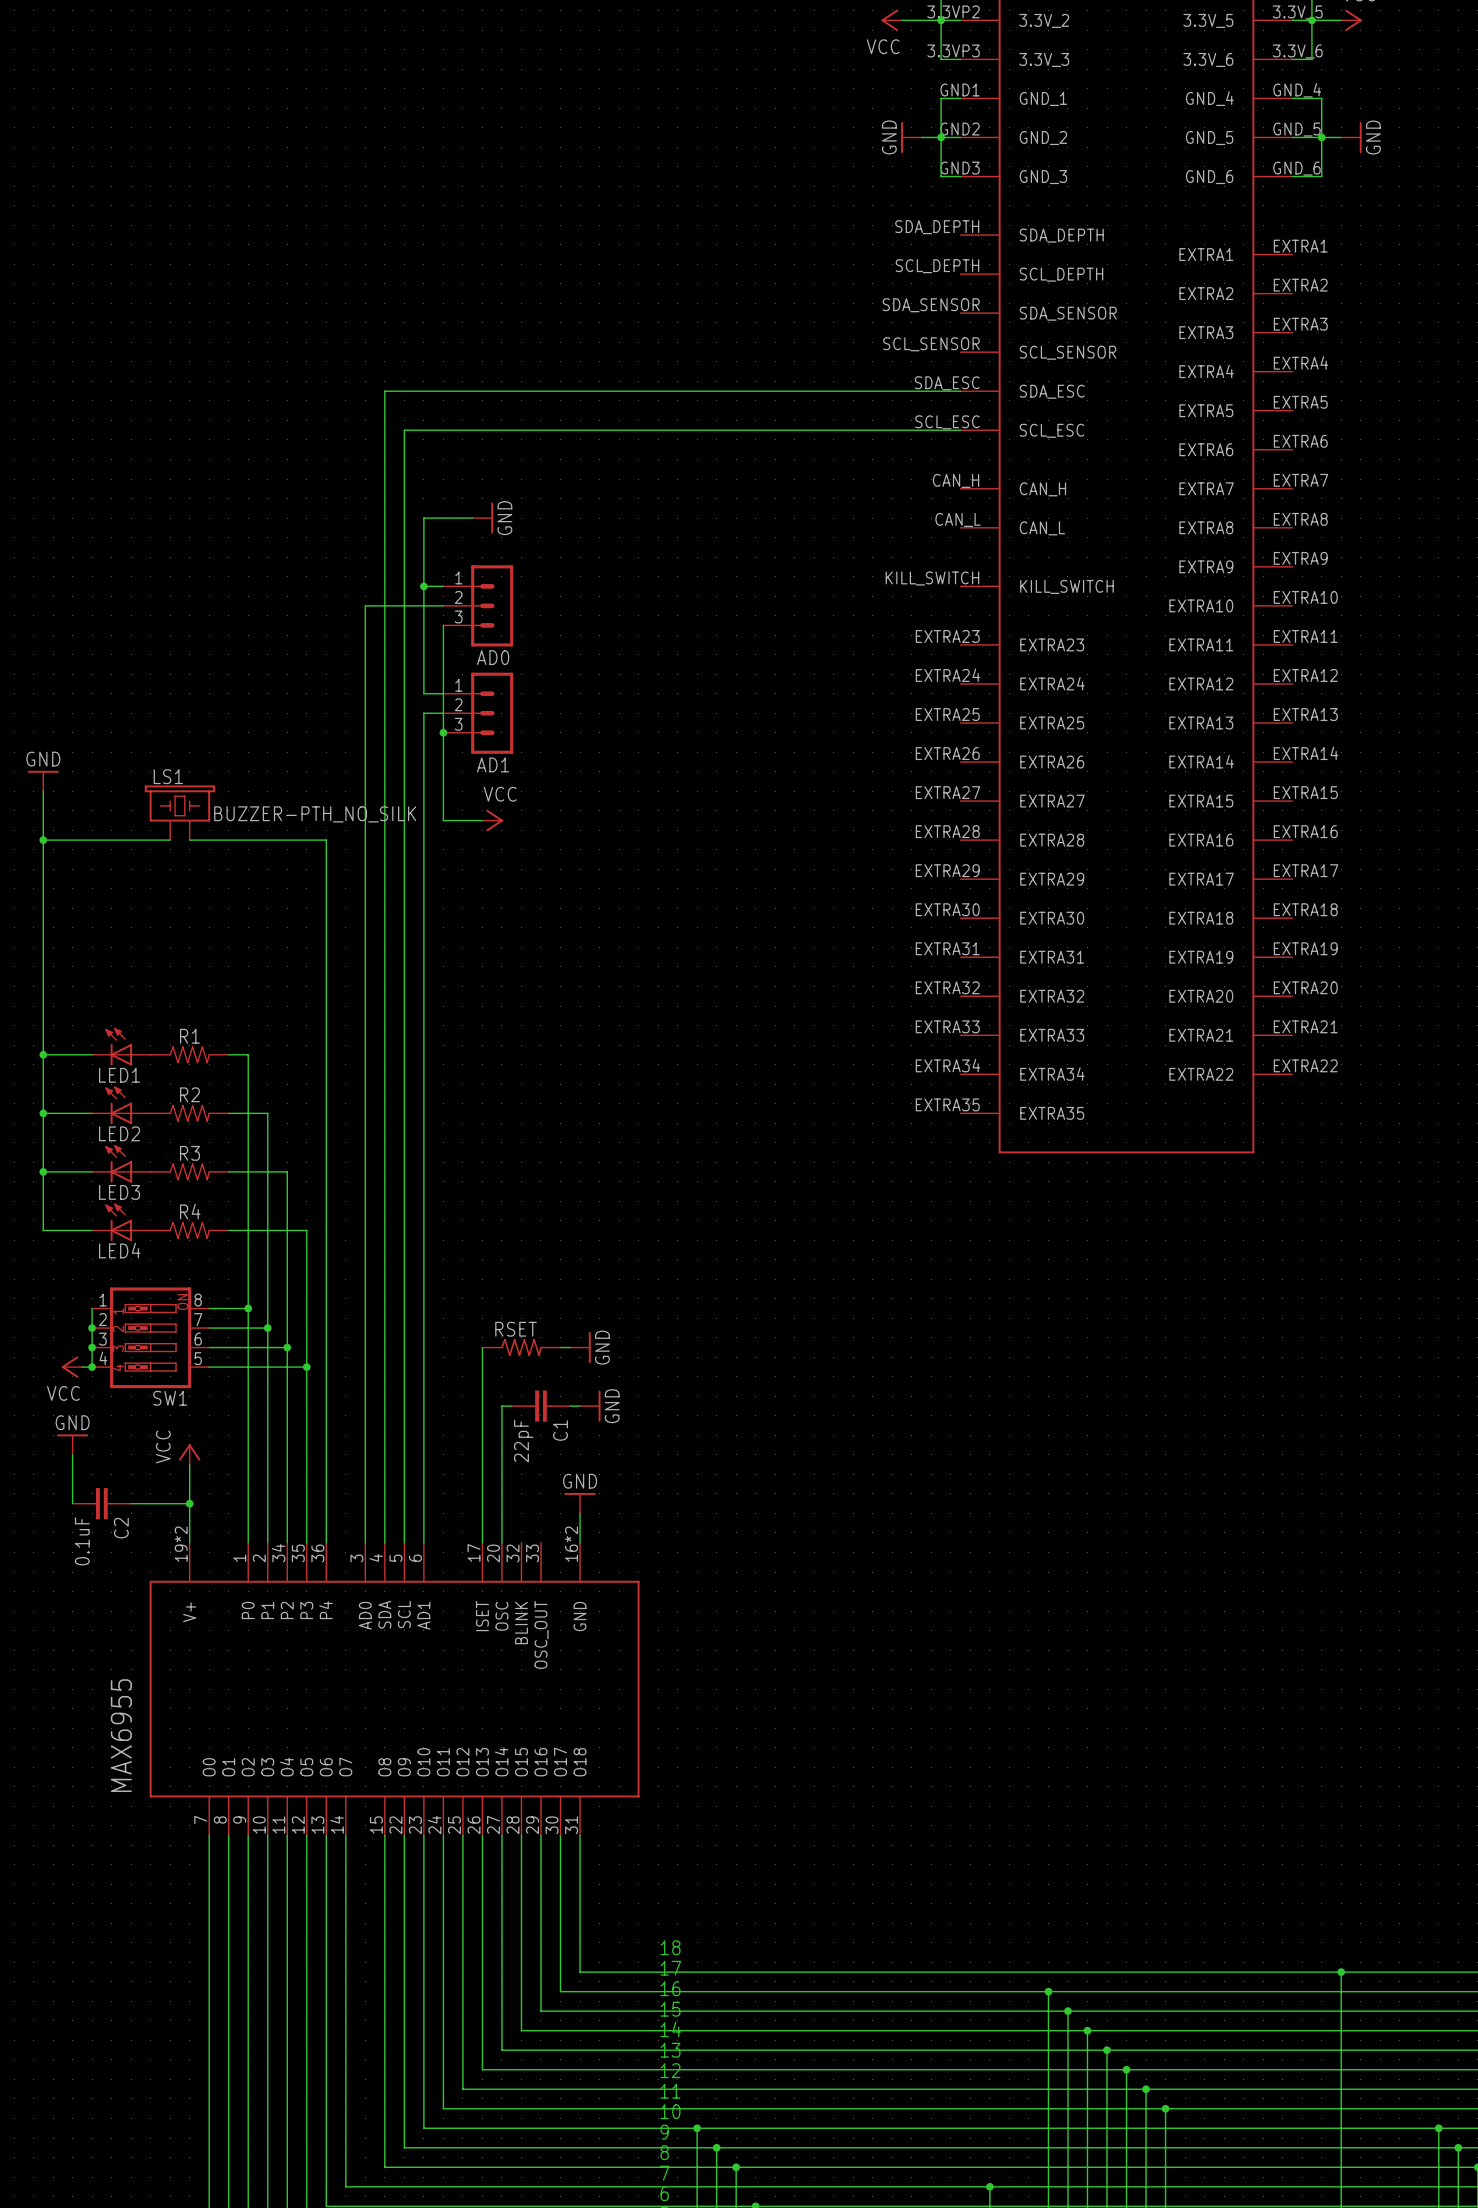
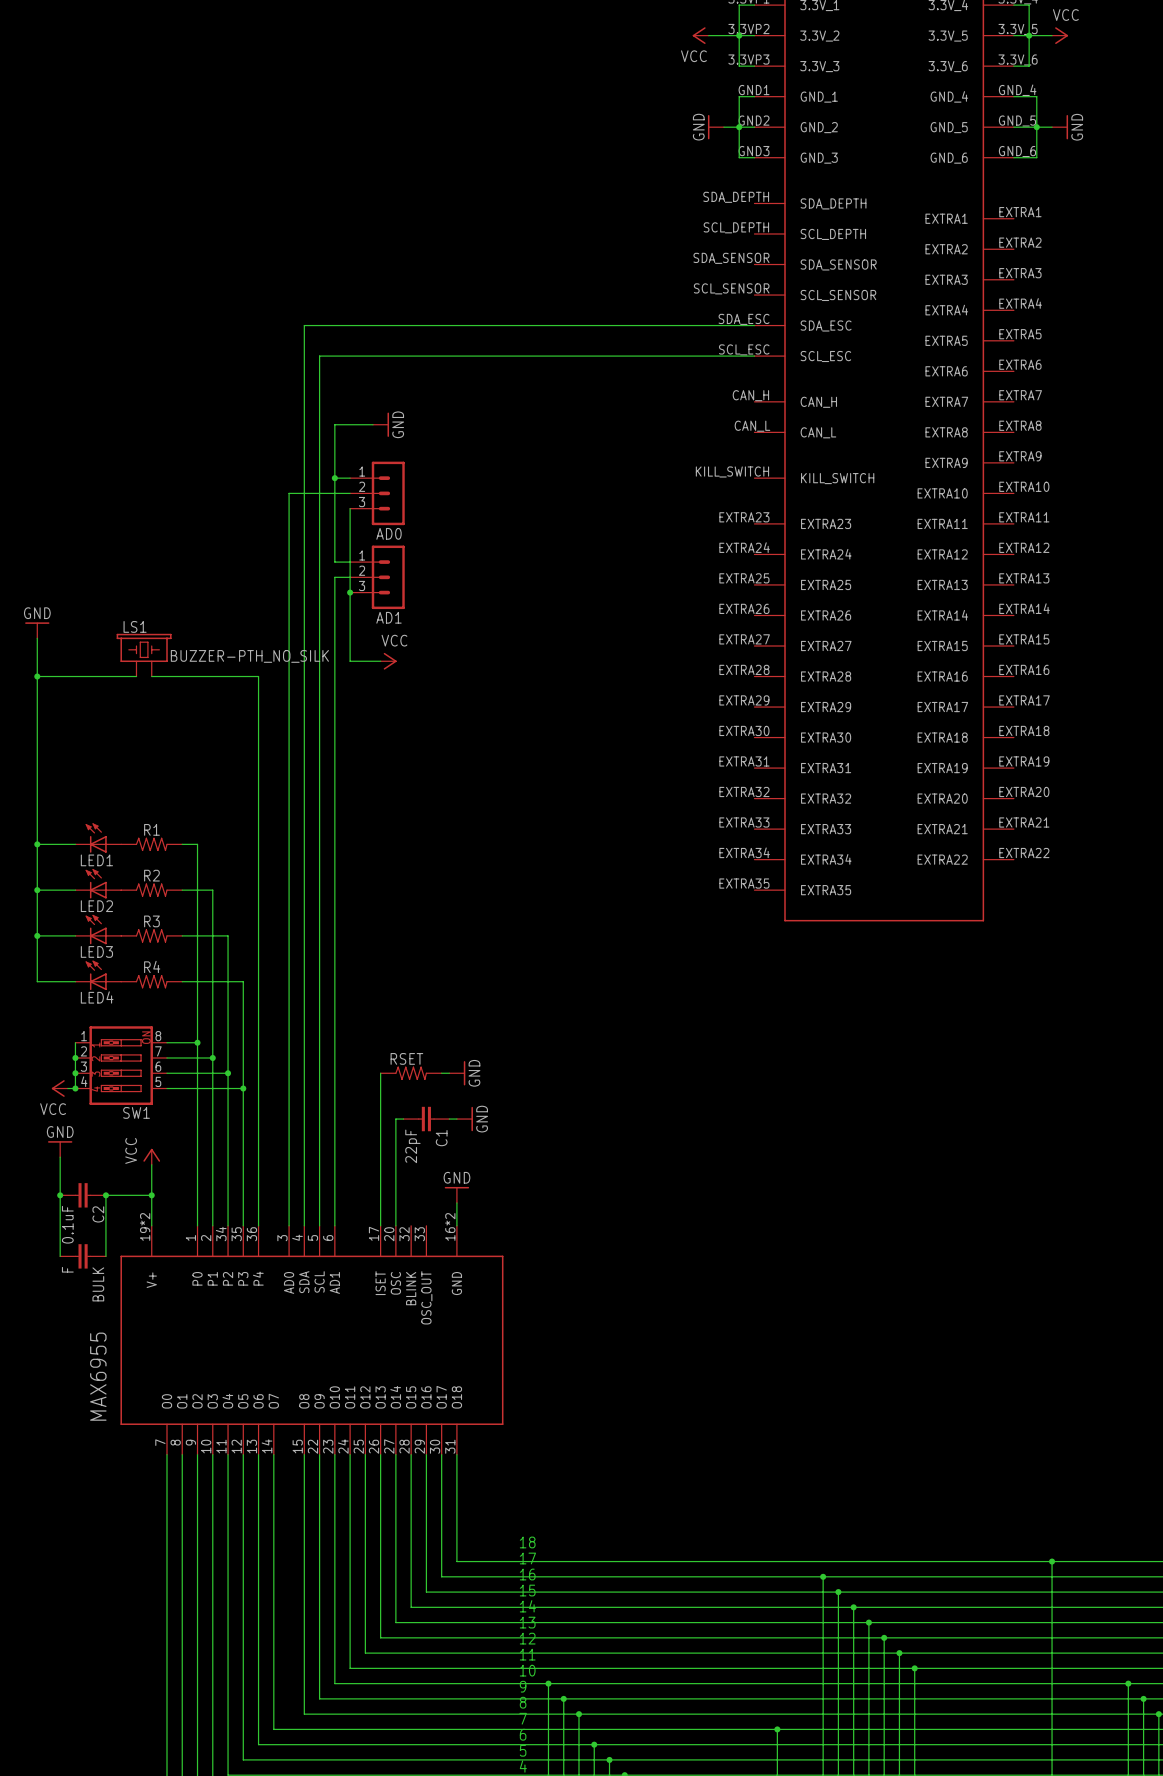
wire: none -> (60, 1195) (60, 1256)
junction: none -> (60, 1195)
wire: none -> (105, 1195) (105, 1256)
junction: none -> (105, 1195)
BULK: none -> F (83, 1256)

